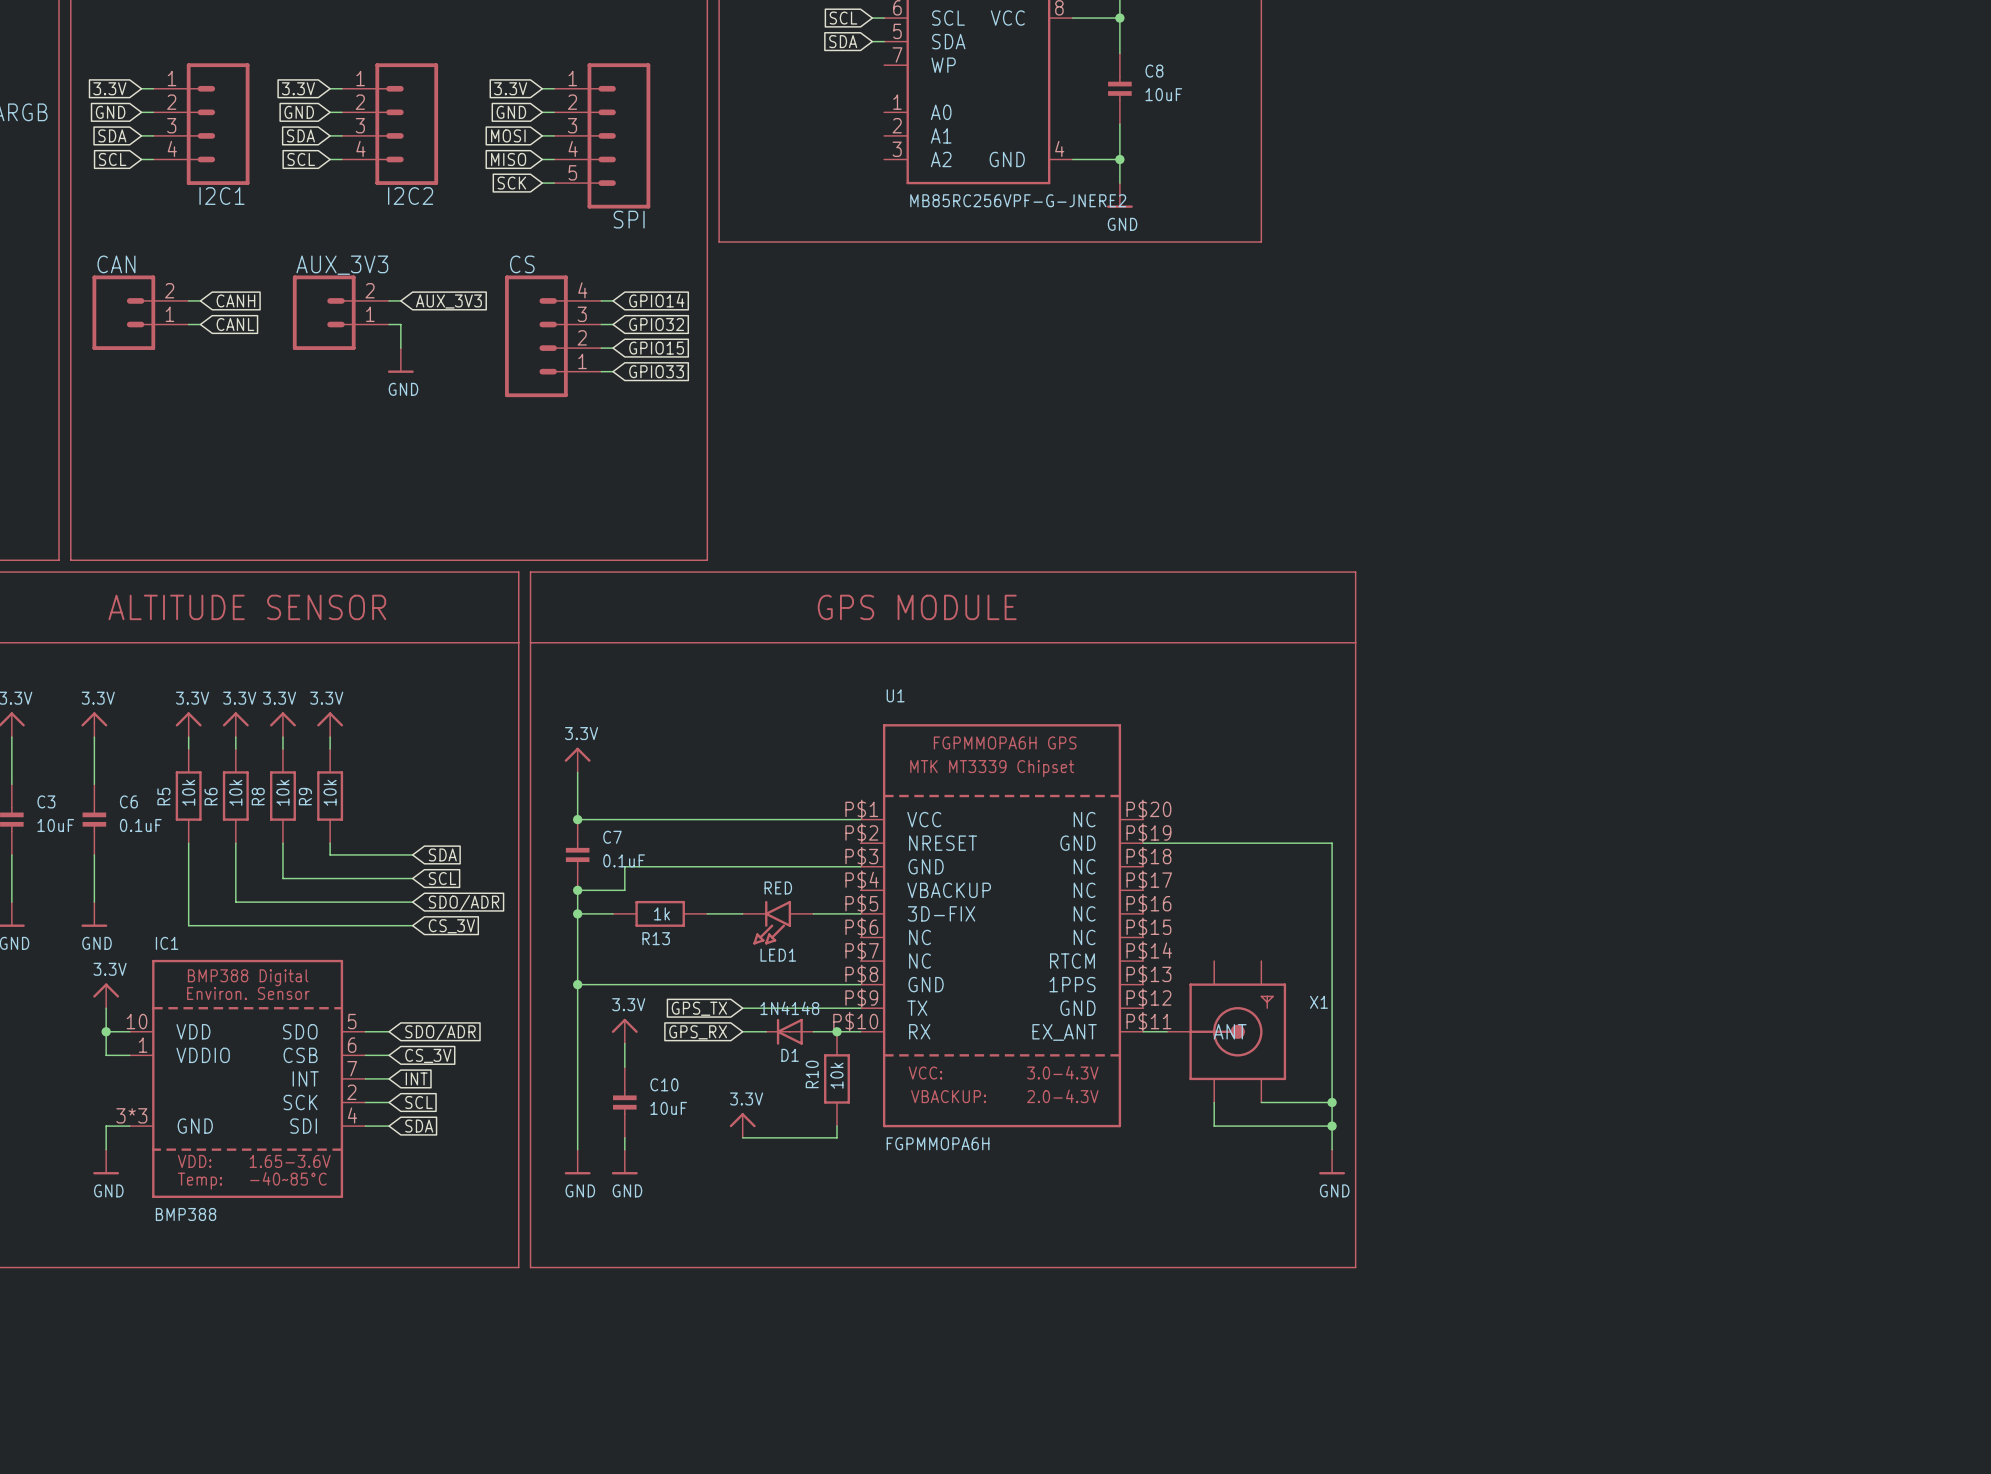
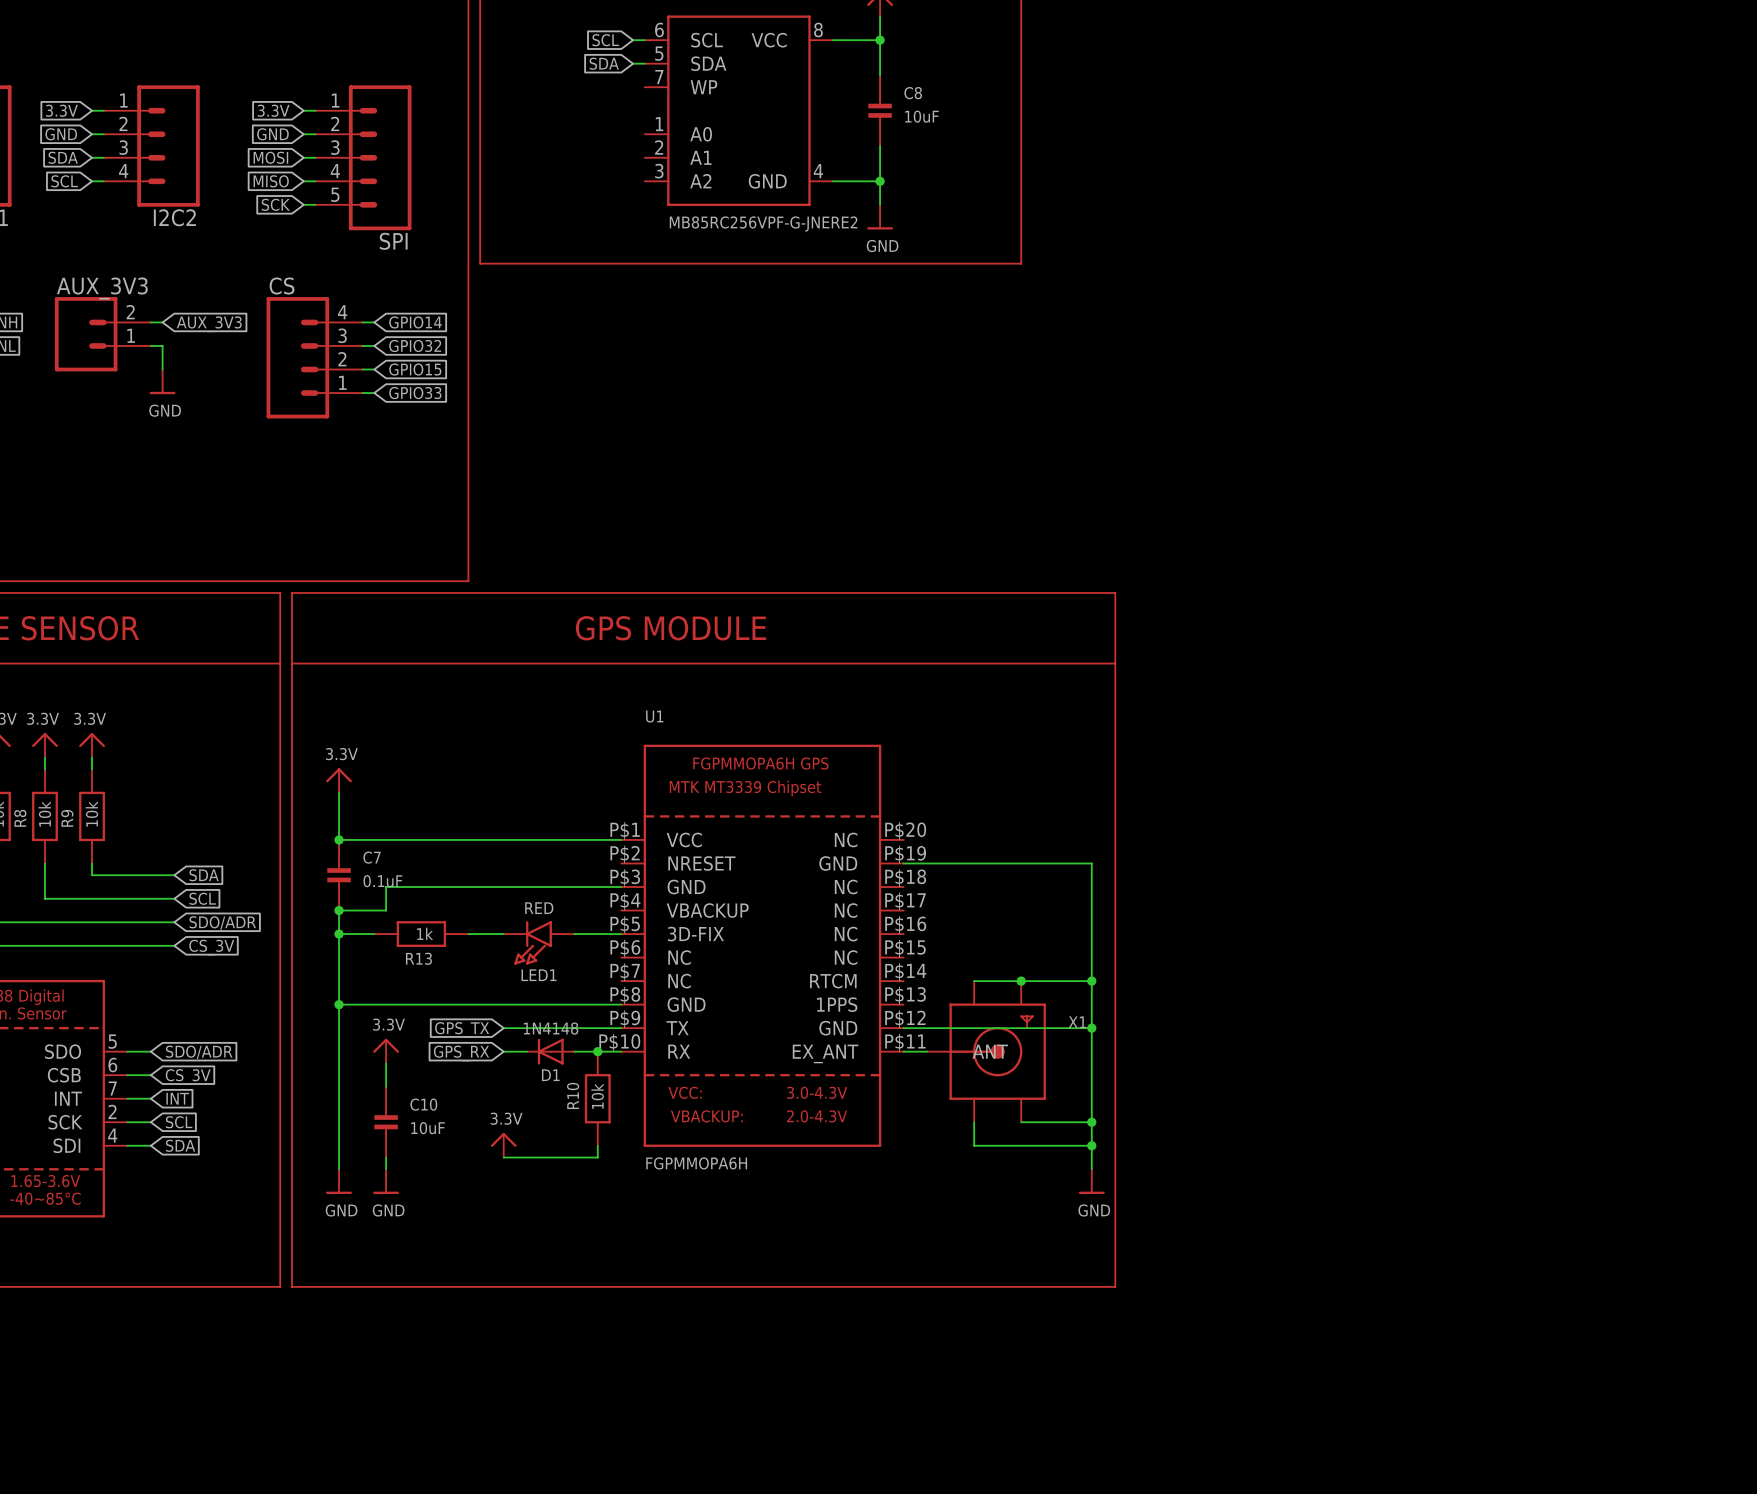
wire: none -> (974, 981) (1091, 981)
junction: none -> (1021, 981)
junction: none -> (1091, 981)
wire: none -> (903, 1028) (1091, 1028)
junction: none -> (1091, 1028)

